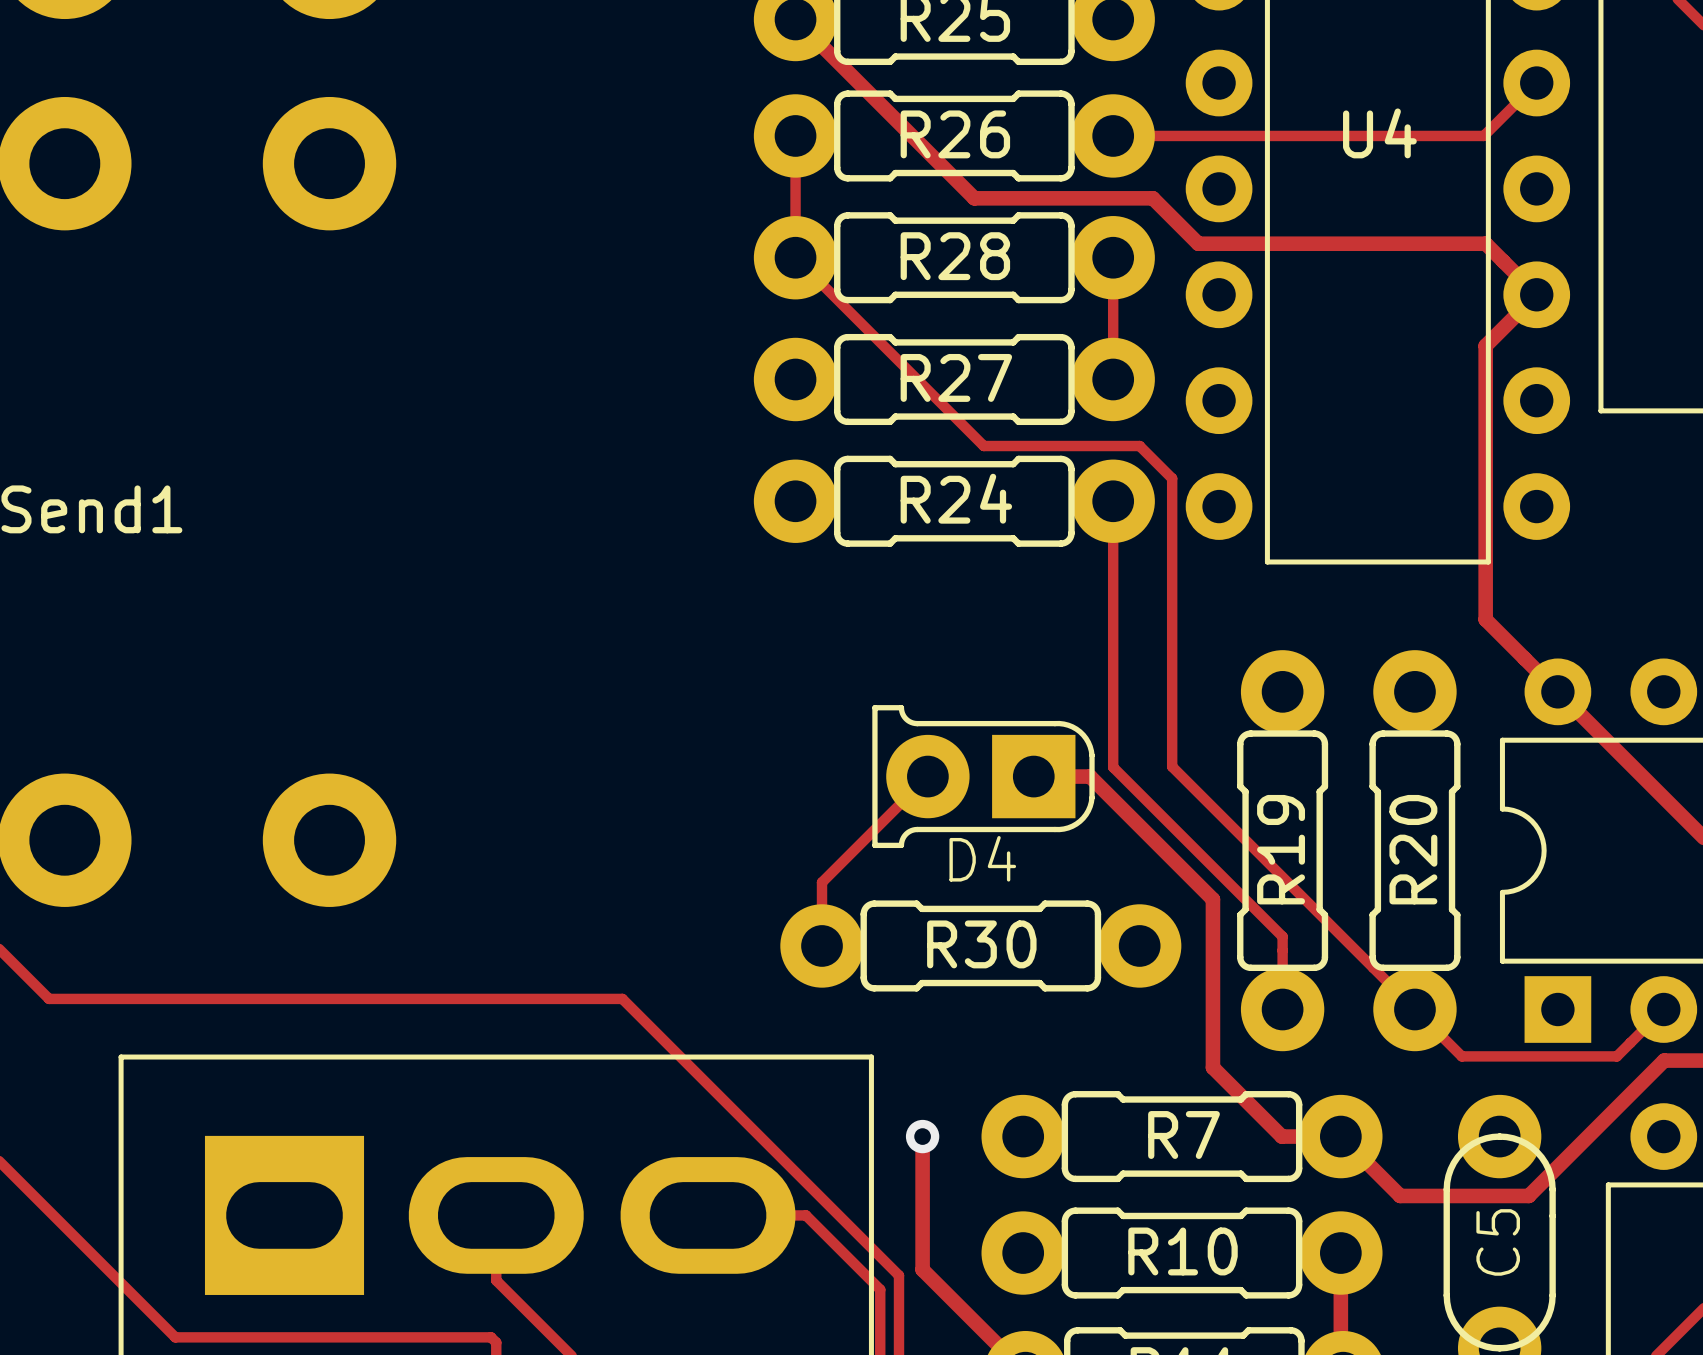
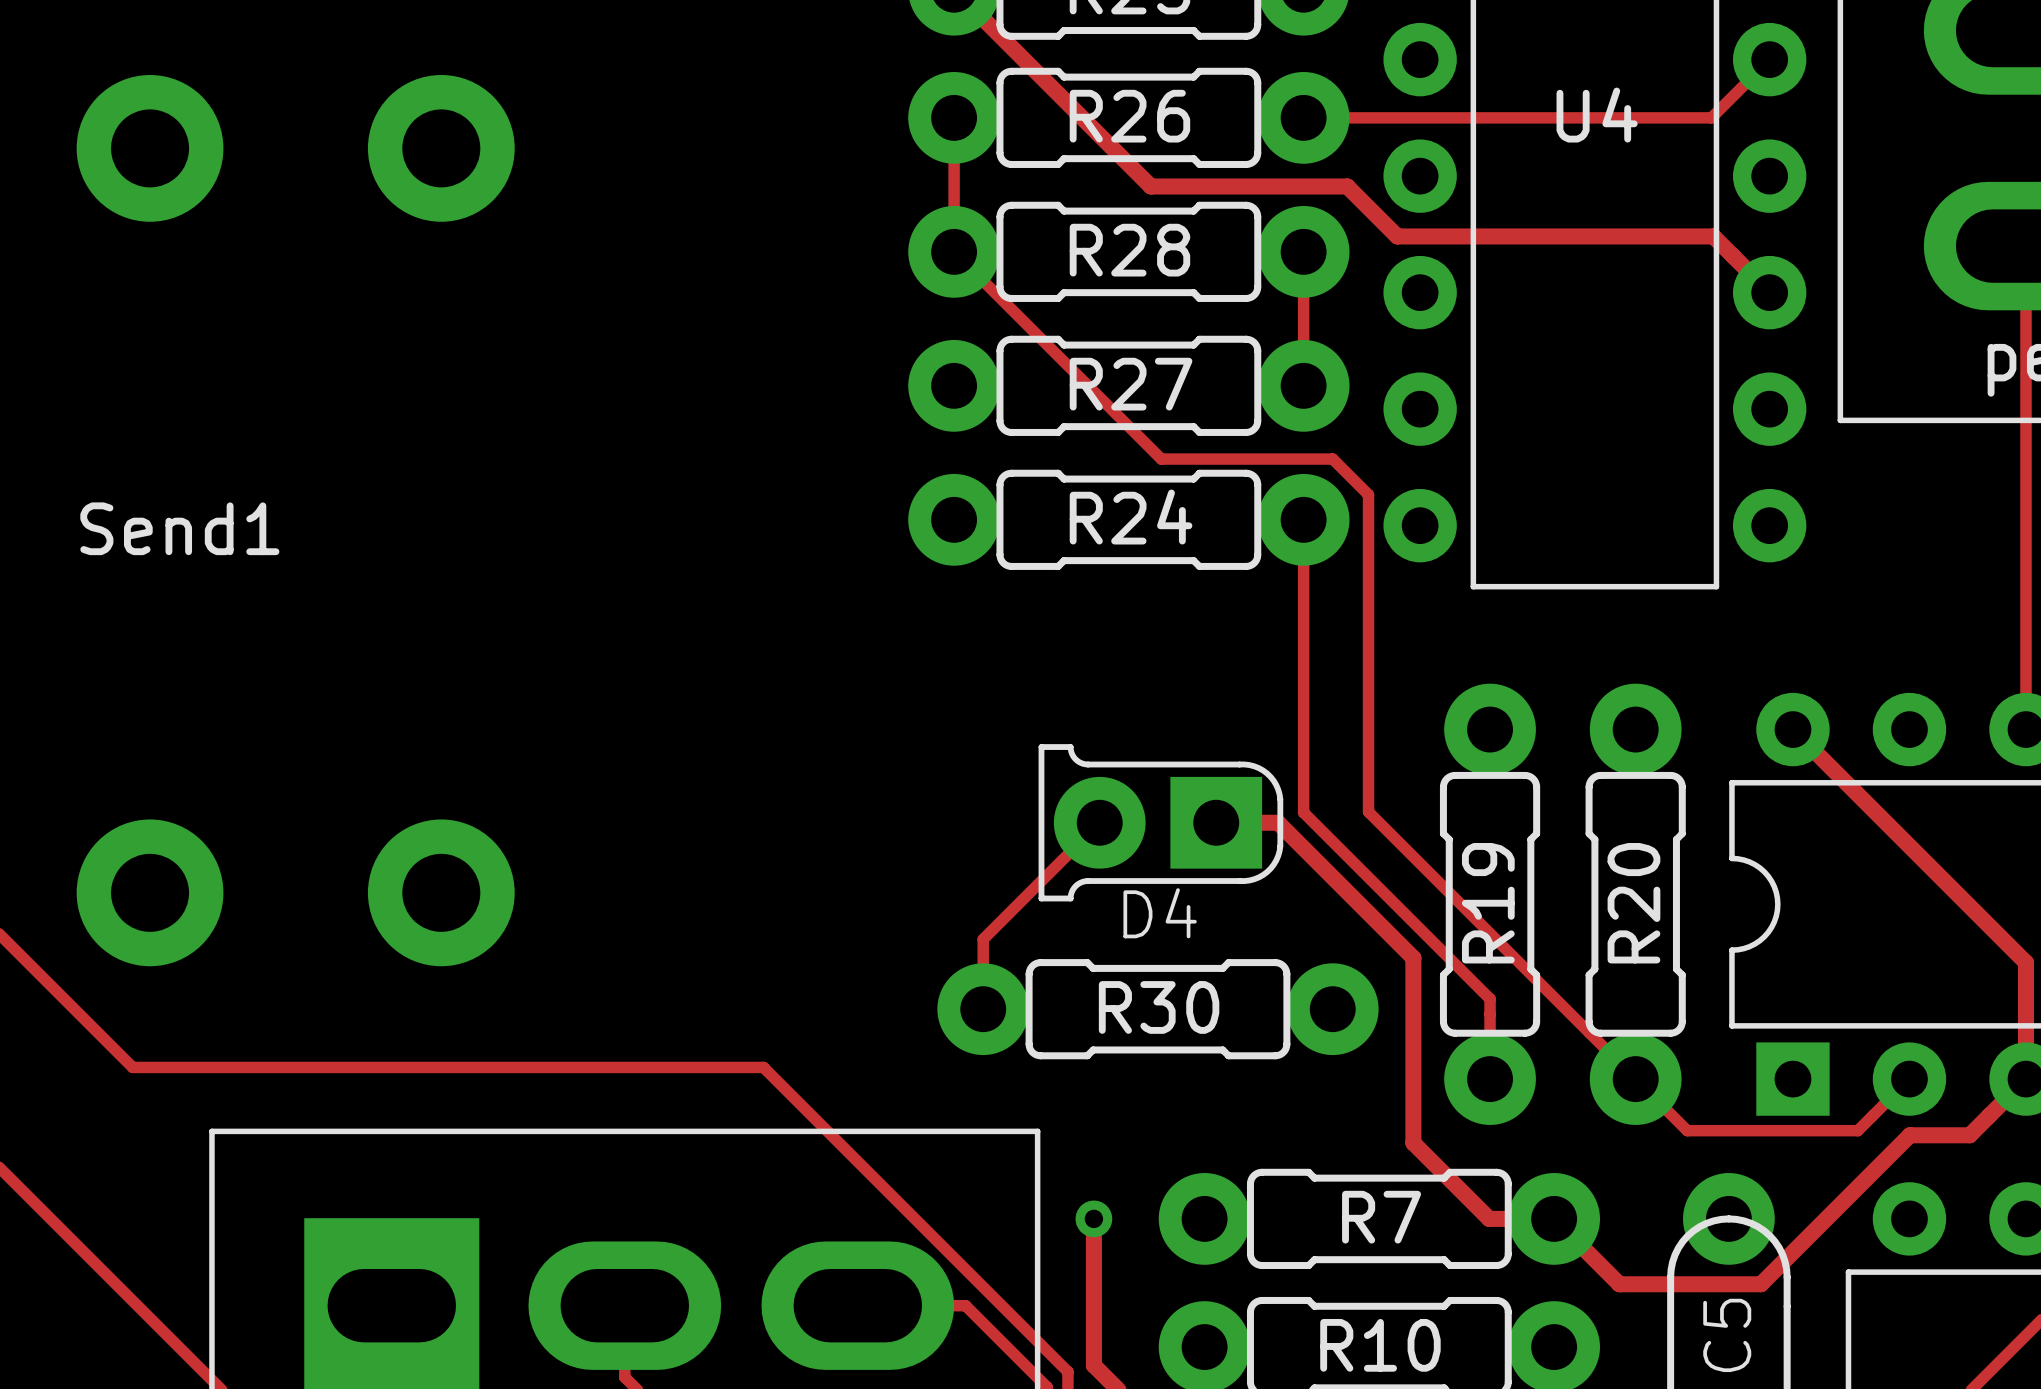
track: (1536, 294) (1485, 345) (1485, 619) (1557, 691) -> none

